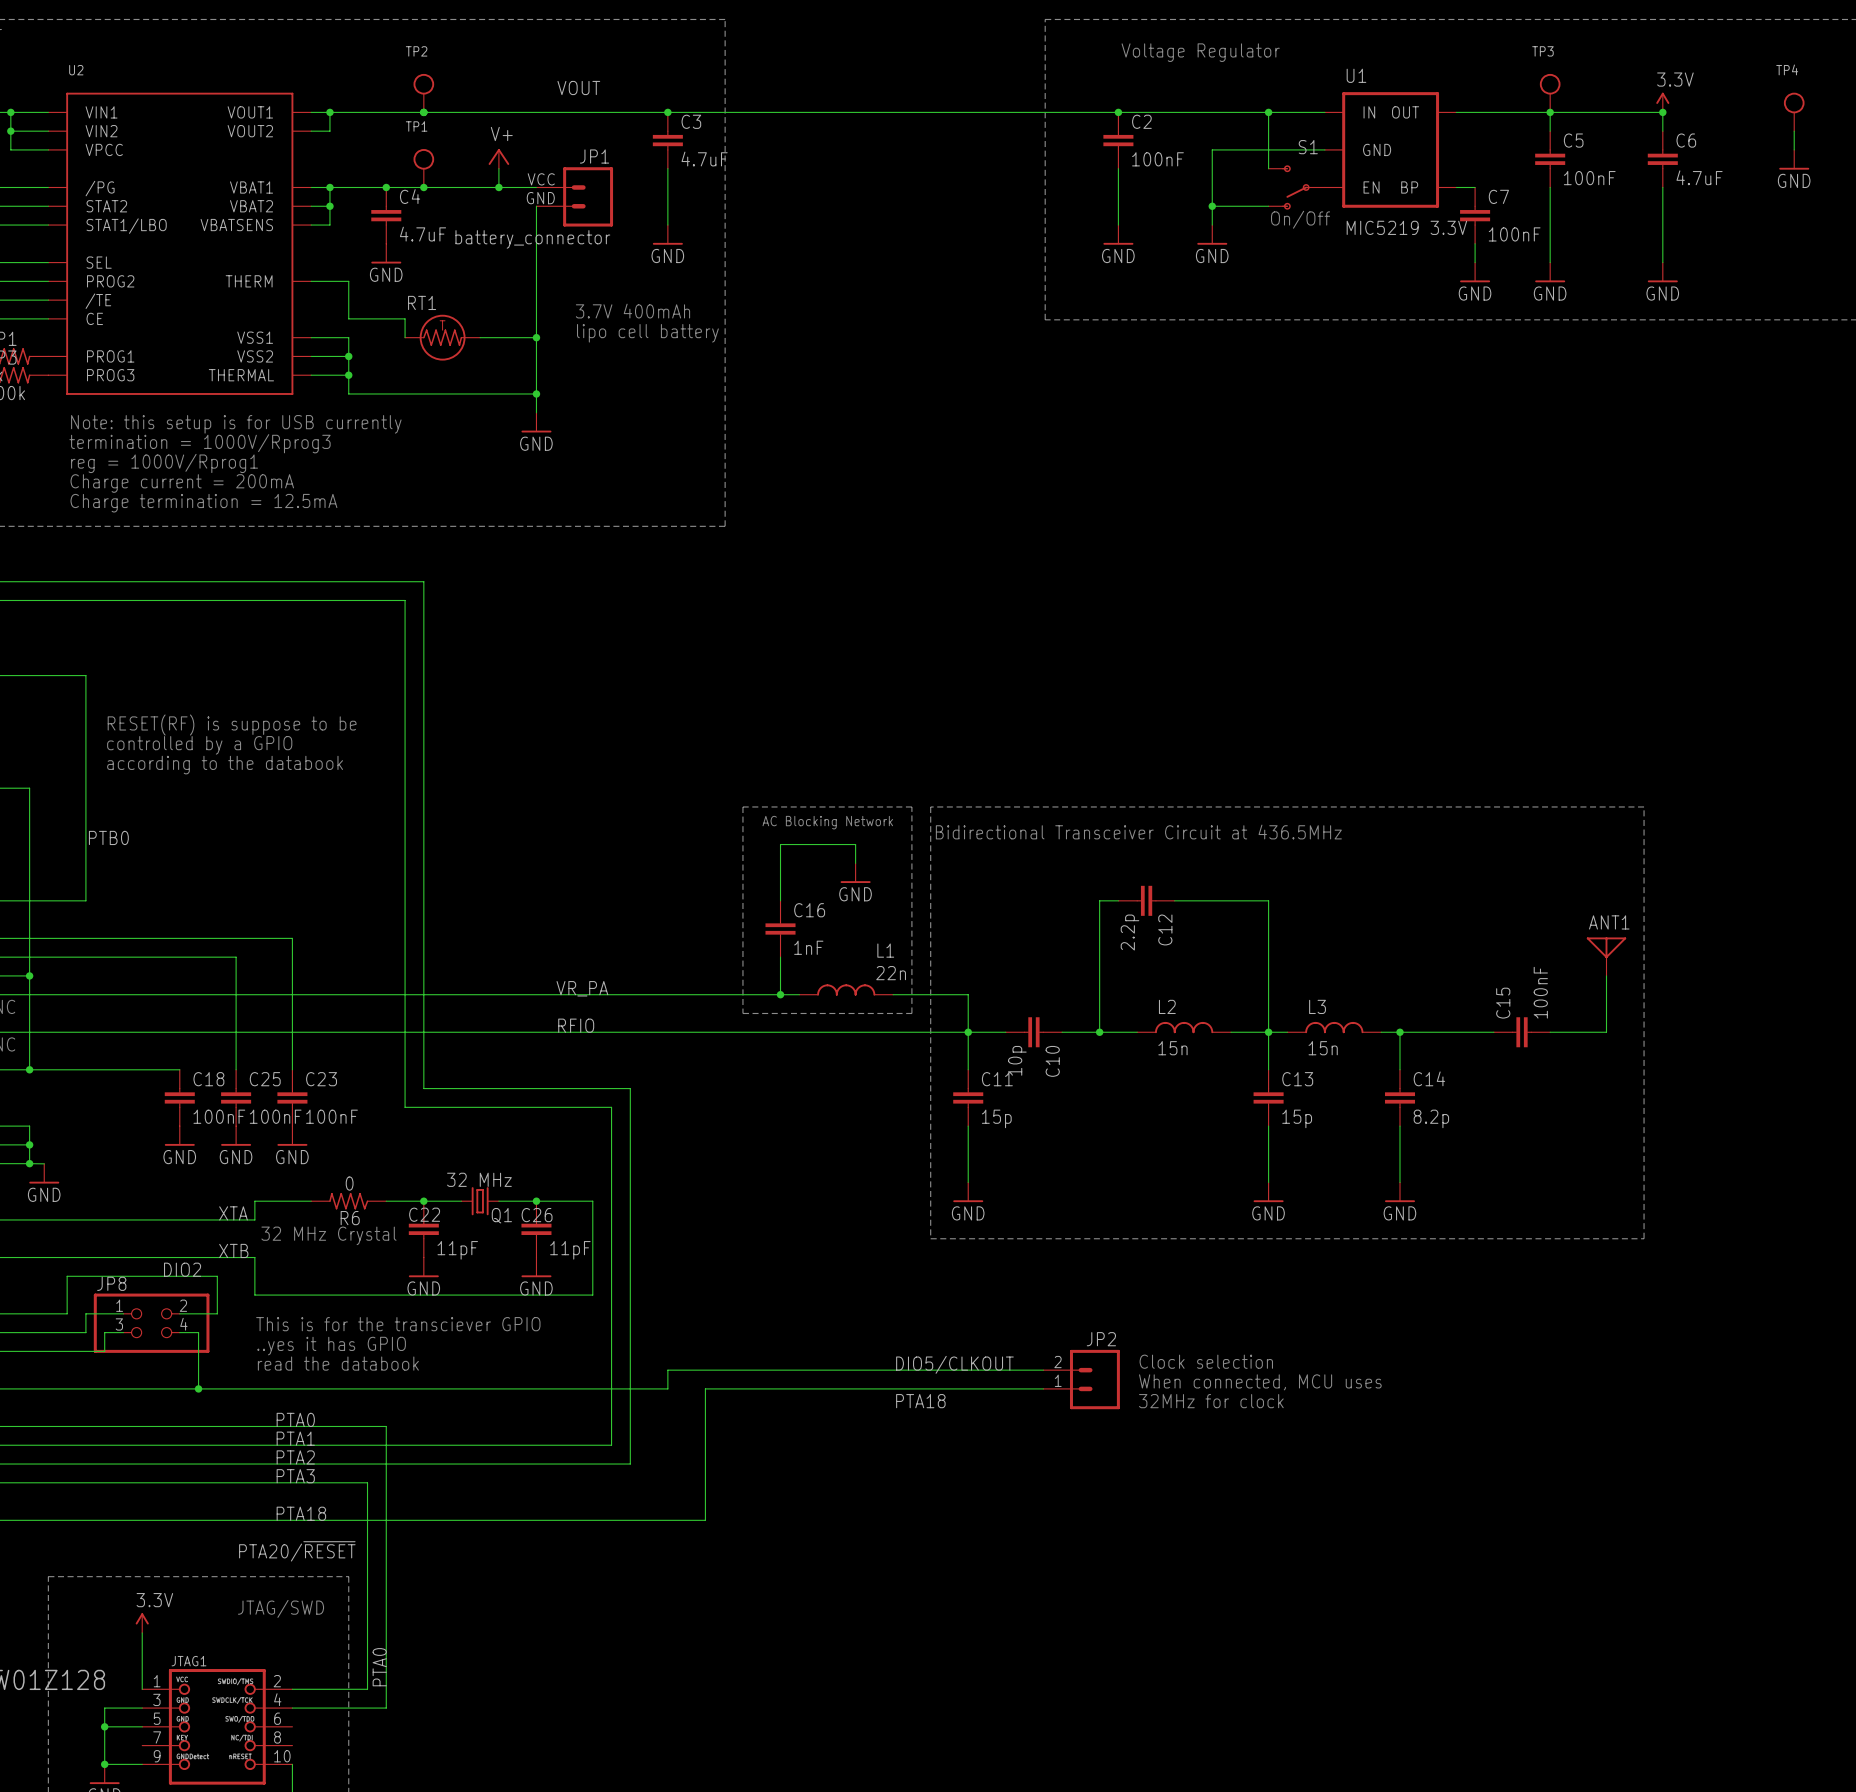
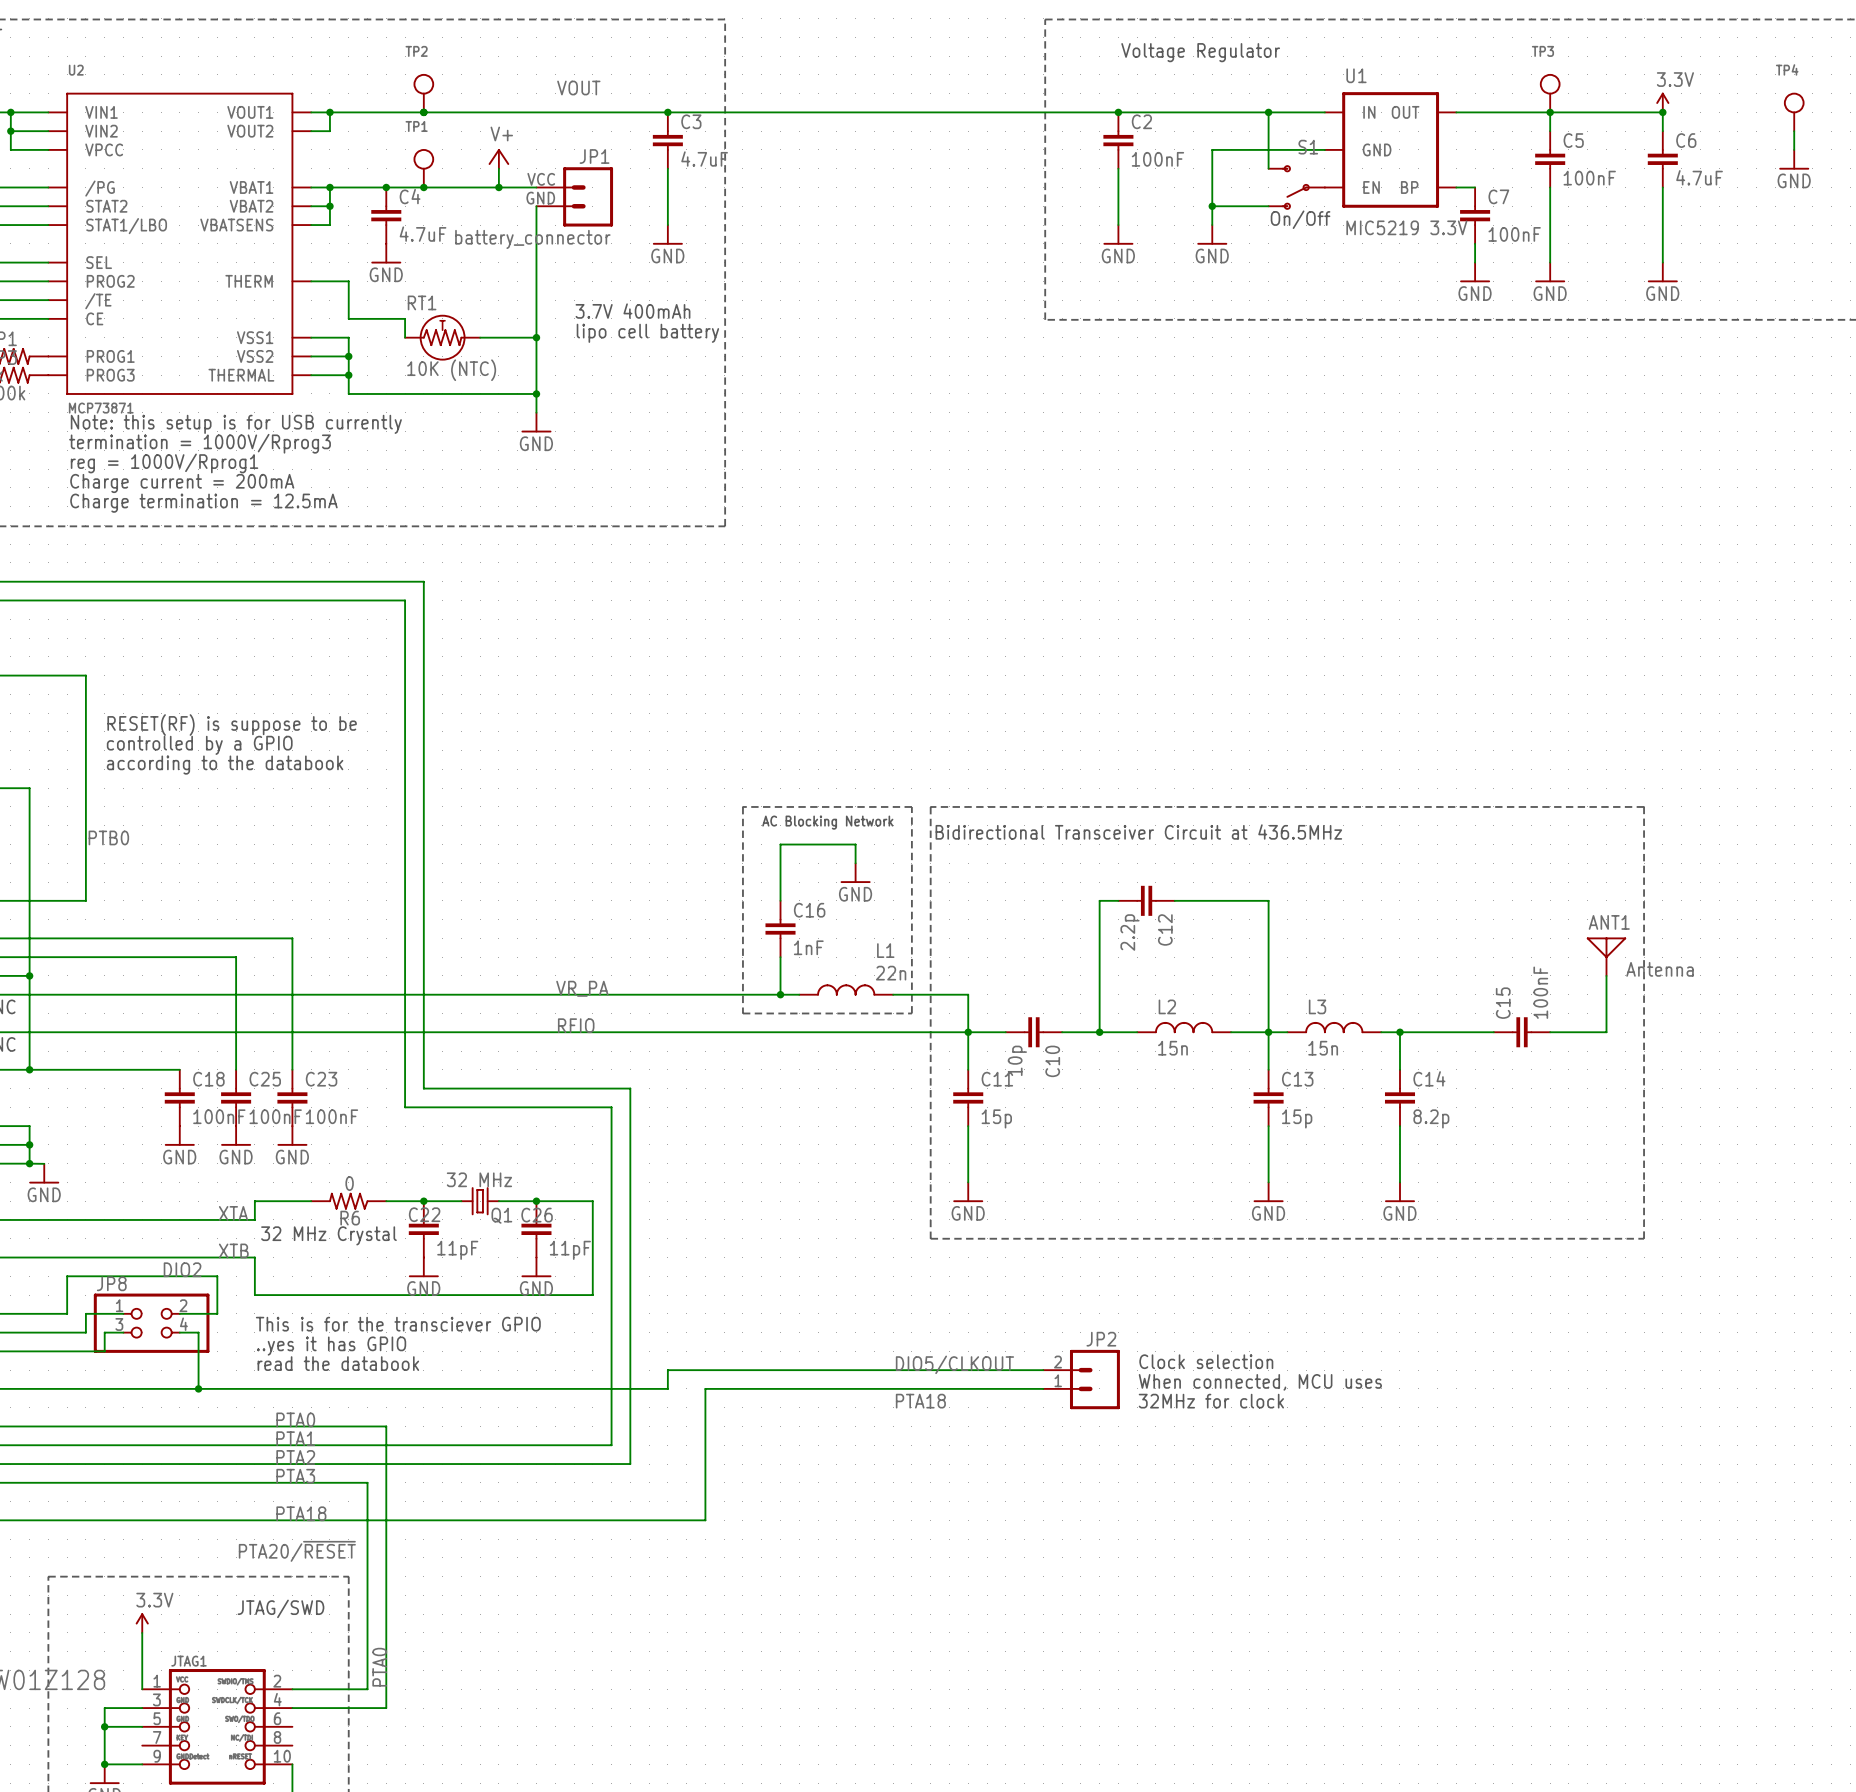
RT1 value: none -> 10K (NTC) (451, 370)
U2 value: none -> MCP73871 (101, 408)
ANT1 value: none -> Antenna (1660, 969)

